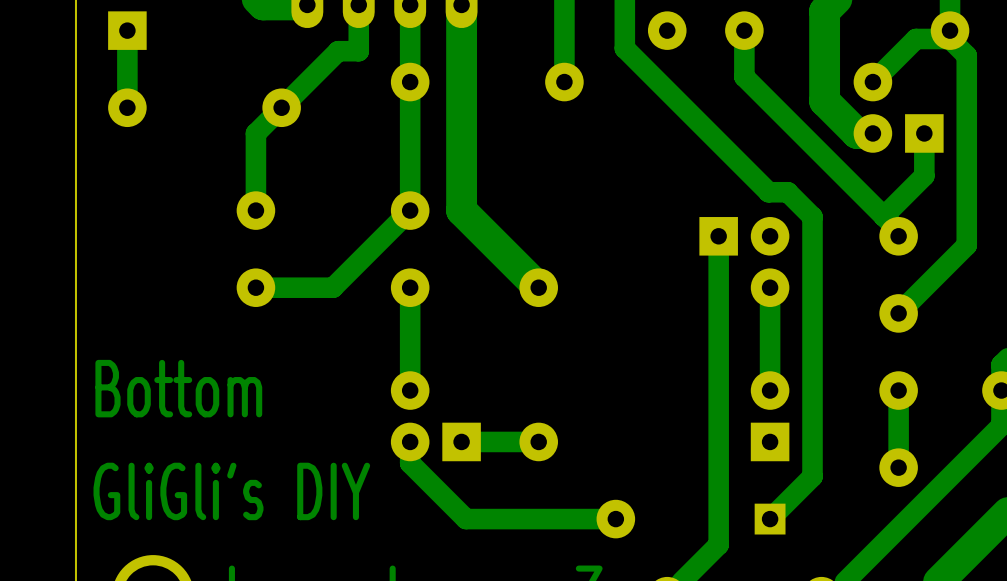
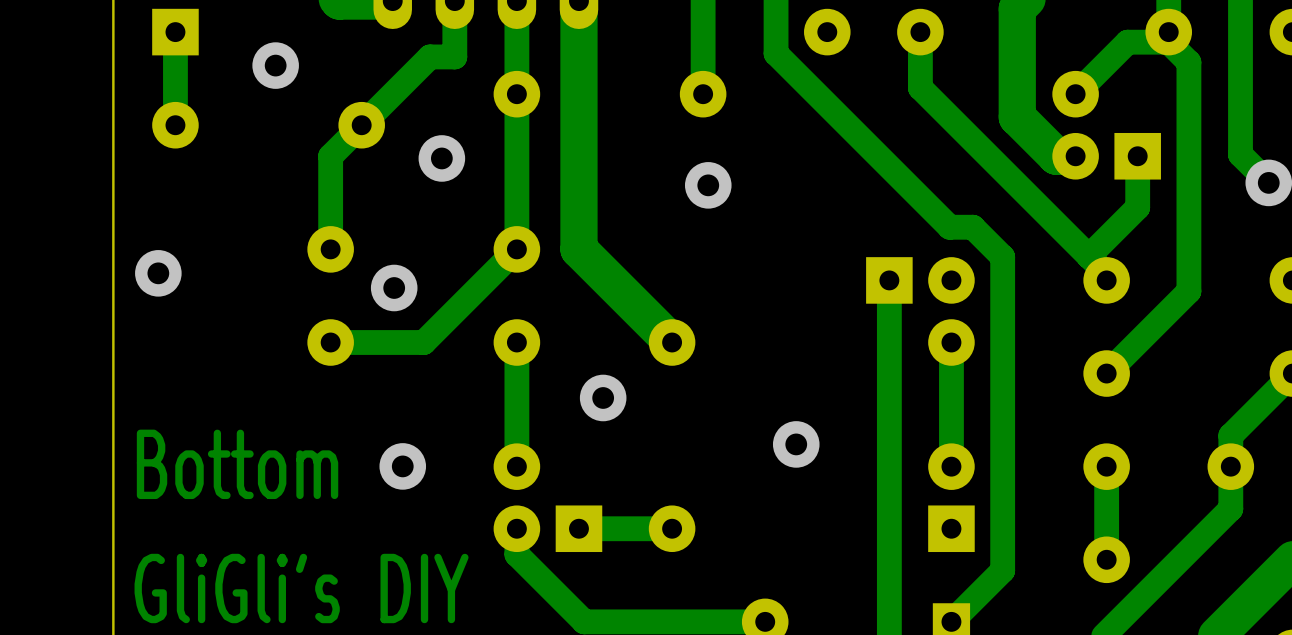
via: none -> (275, 65)
via: none -> (441, 158)
via: none -> (708, 185)
via: none -> (158, 273)
via: none -> (394, 288)
via: none -> (603, 397)
via: none -> (796, 444)
via: none -> (402, 466)

